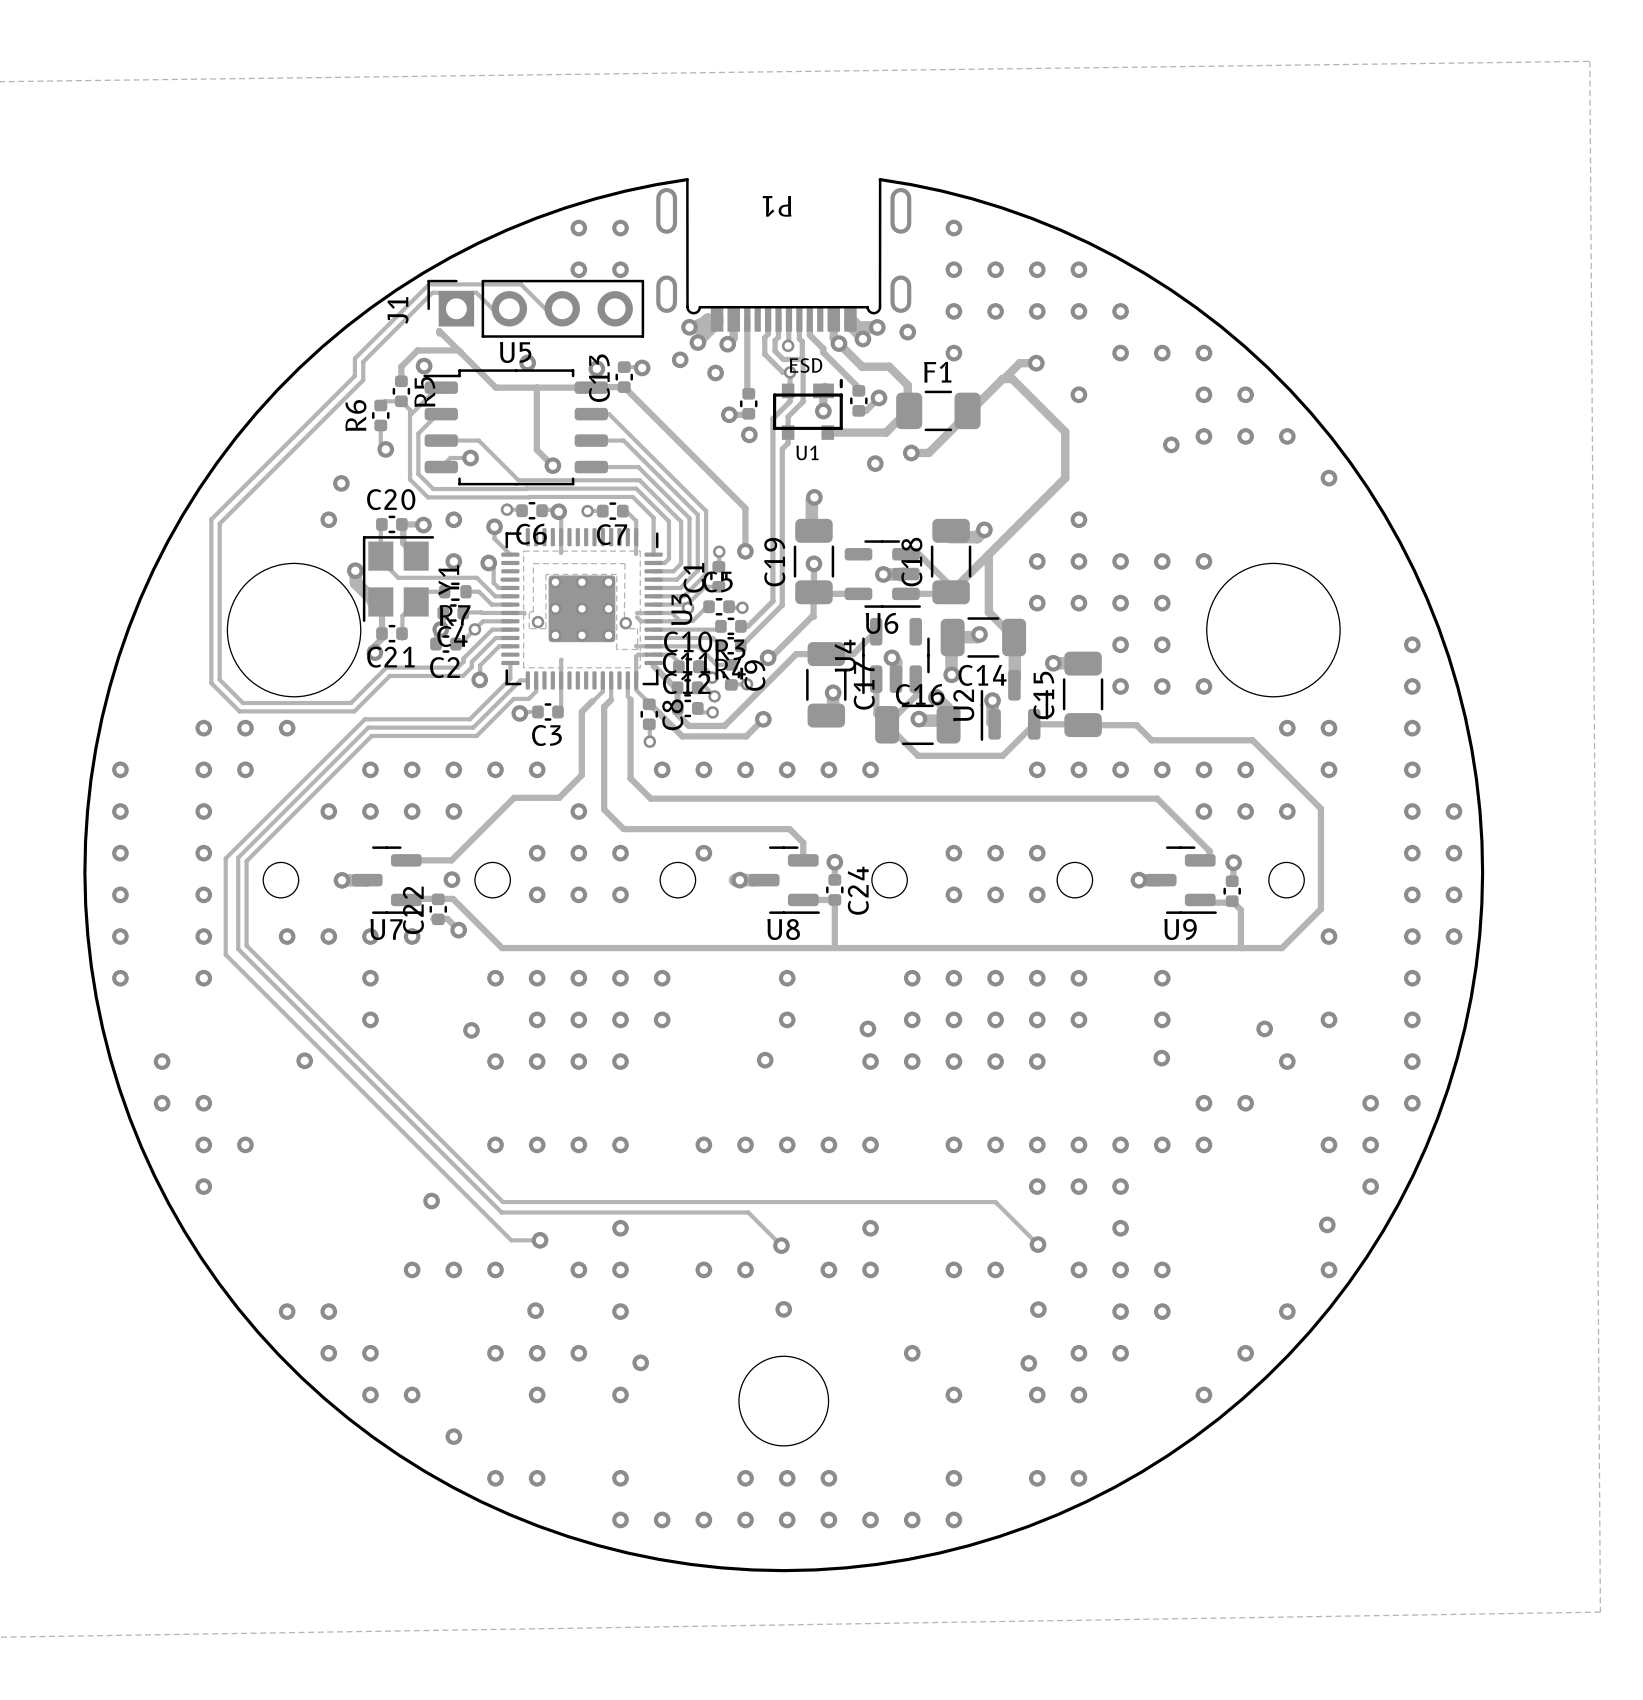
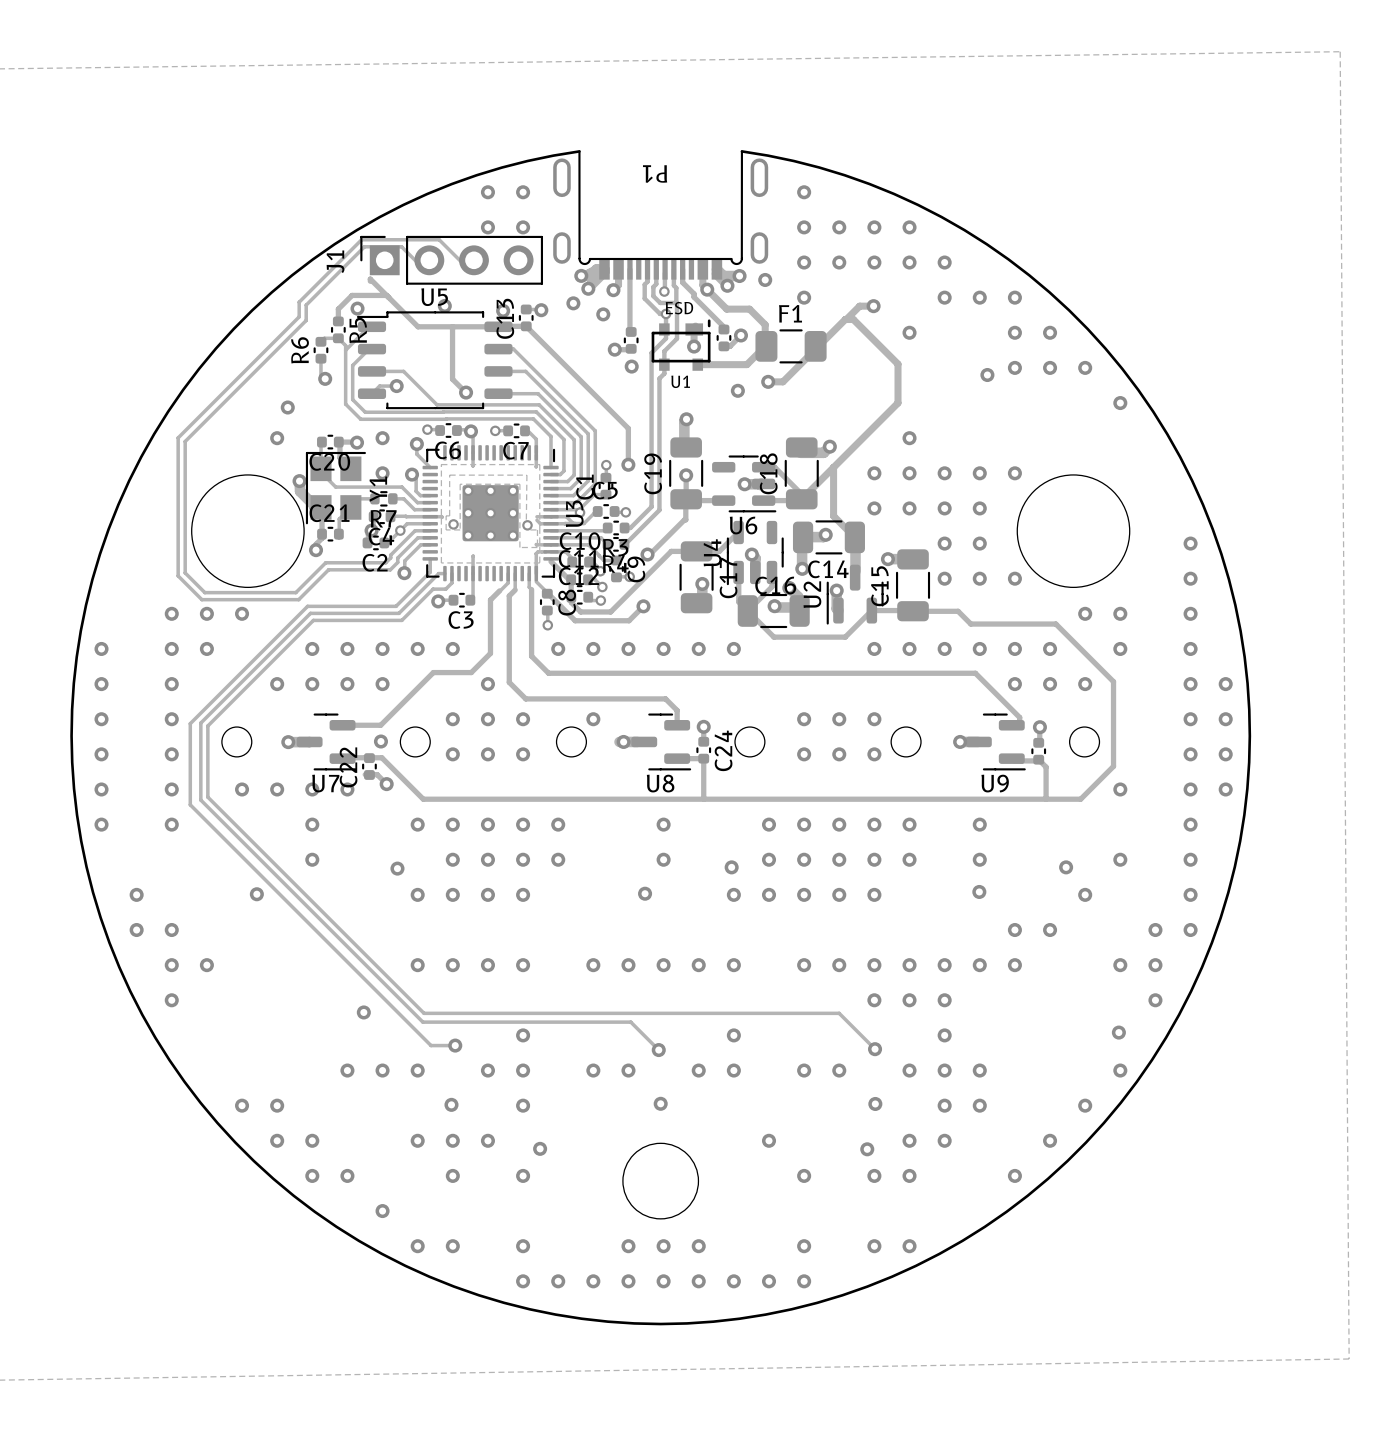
C20 name position: C20 (391, 499) -> C20 (329, 461)
C21 name position: C21 (390, 657) -> C21 (329, 513)

